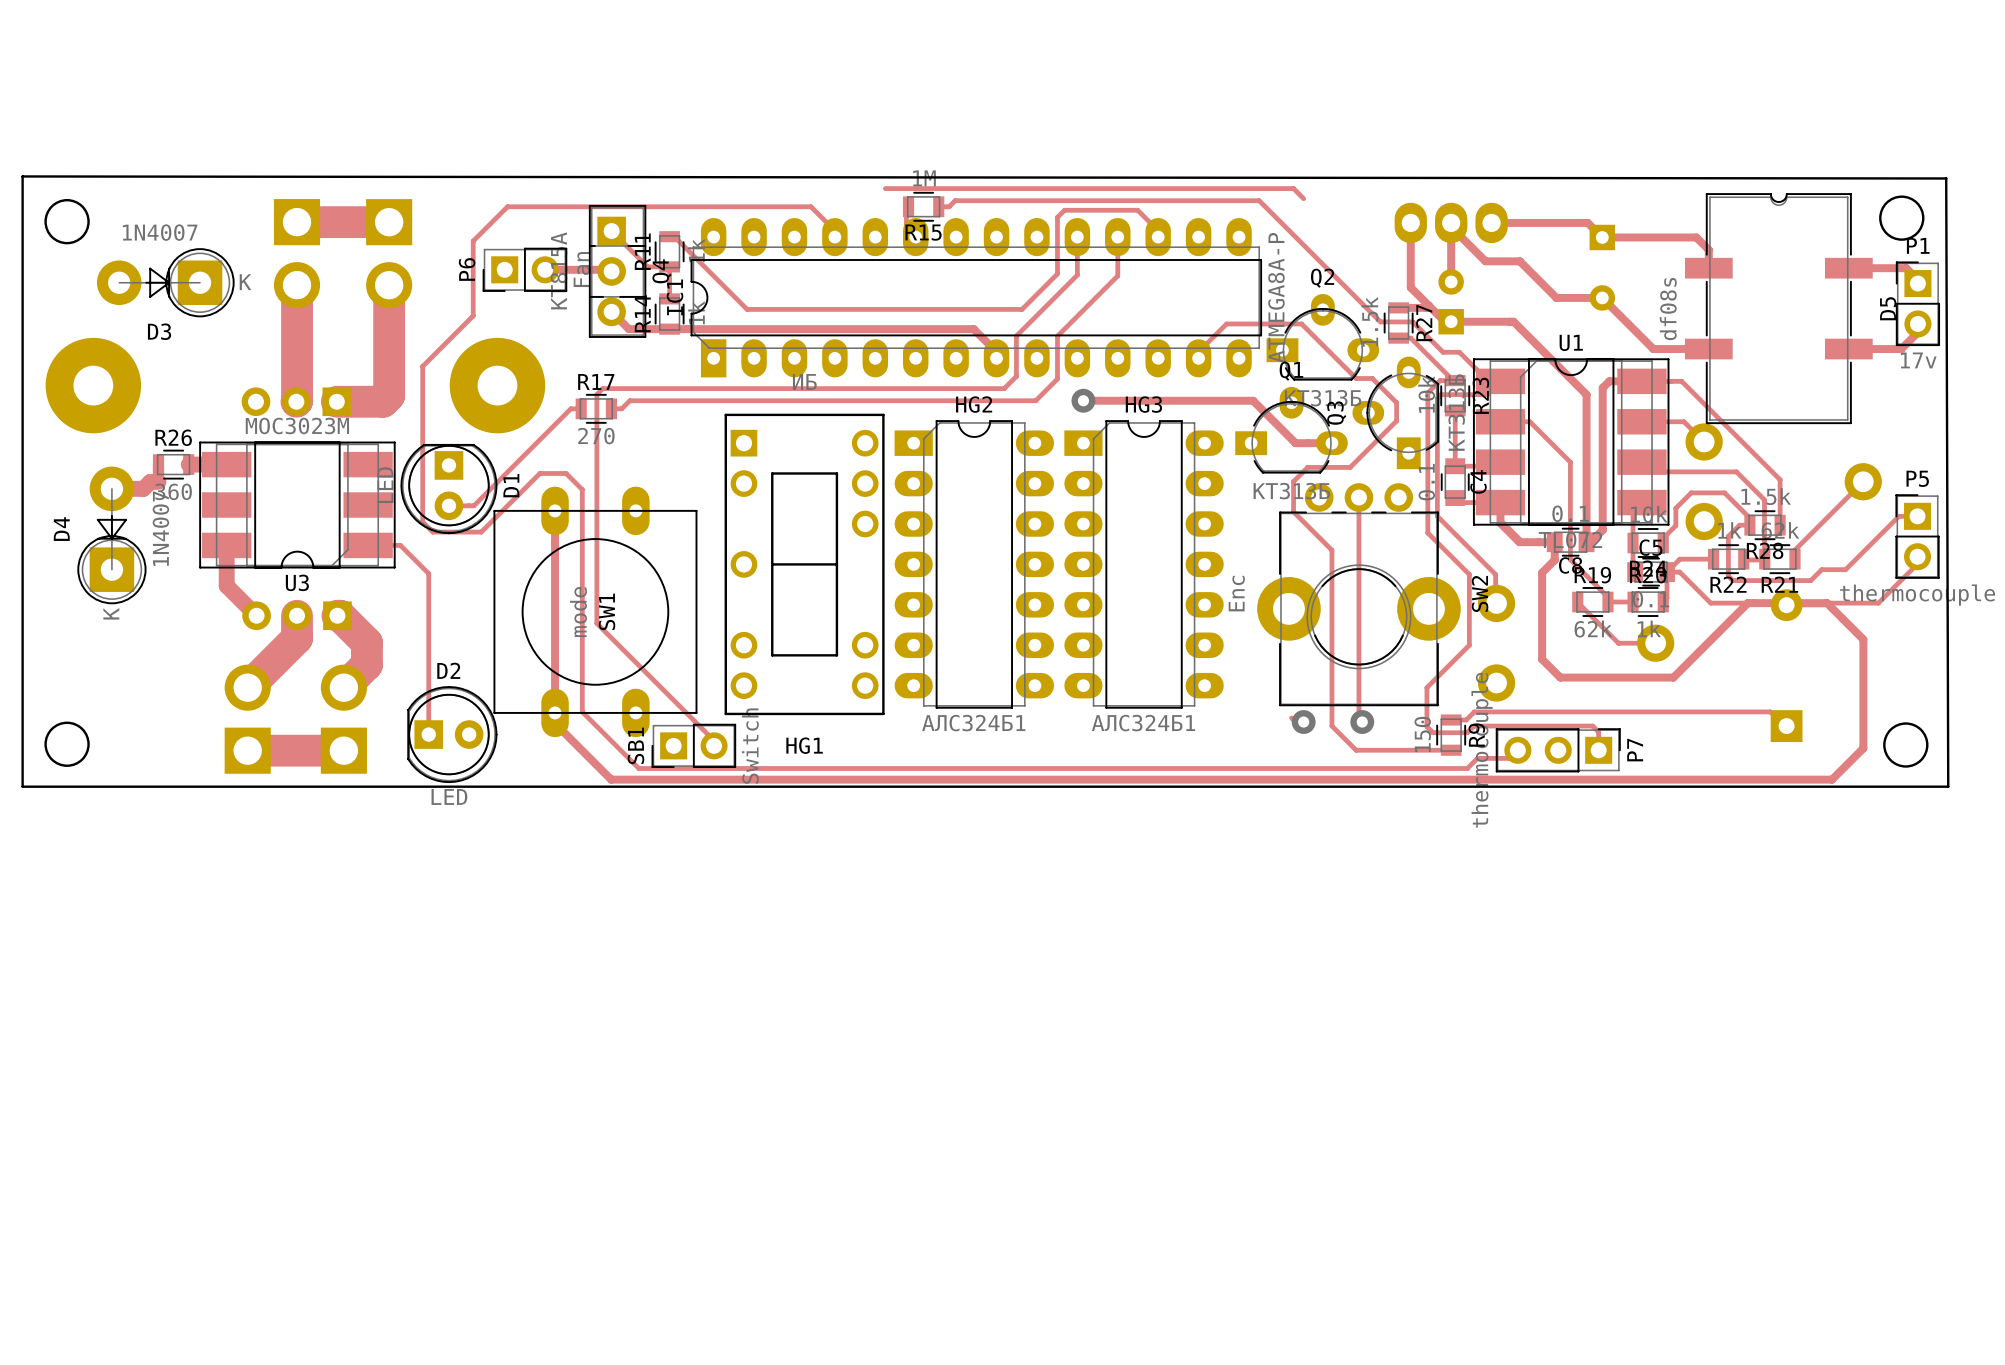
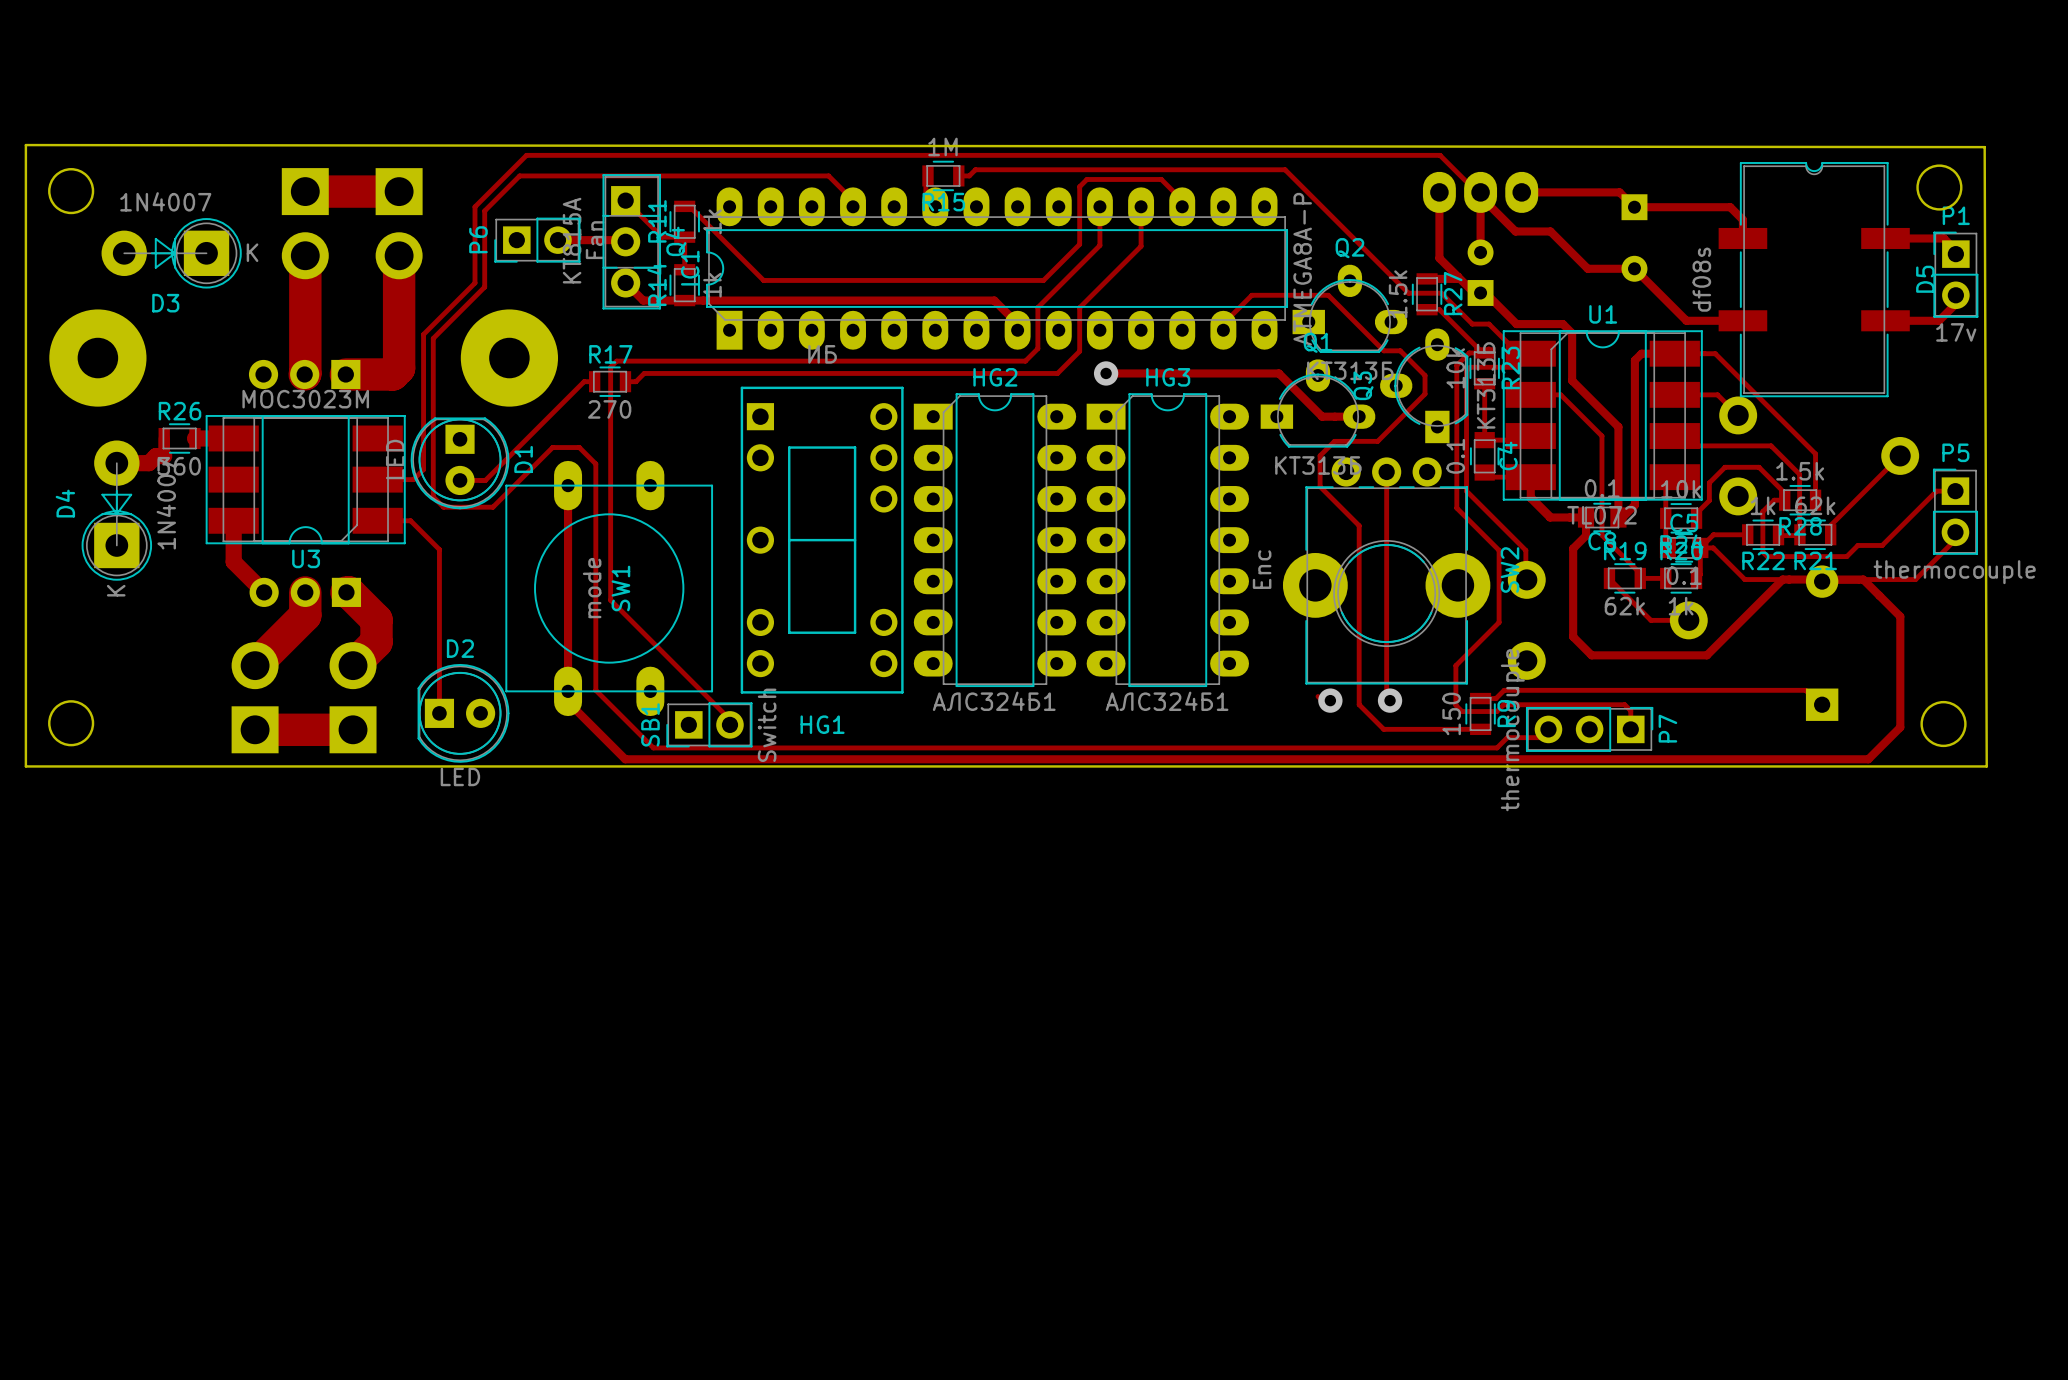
track: (885, 188) (1293, 188) (1303, 198) -> none
track: none -> (1480, 192) (1480, 195) (1440, 155) (526, 155) (474, 206) (474, 283) (423, 334) (423, 469) (413, 479) (377, 479)
track: (1456, 321) (1513, 321) (1586, 394) (1586, 453) -> (1485, 292) (1516, 324) (1562, 324) (1572, 333) (1572, 380) (1618, 426)

